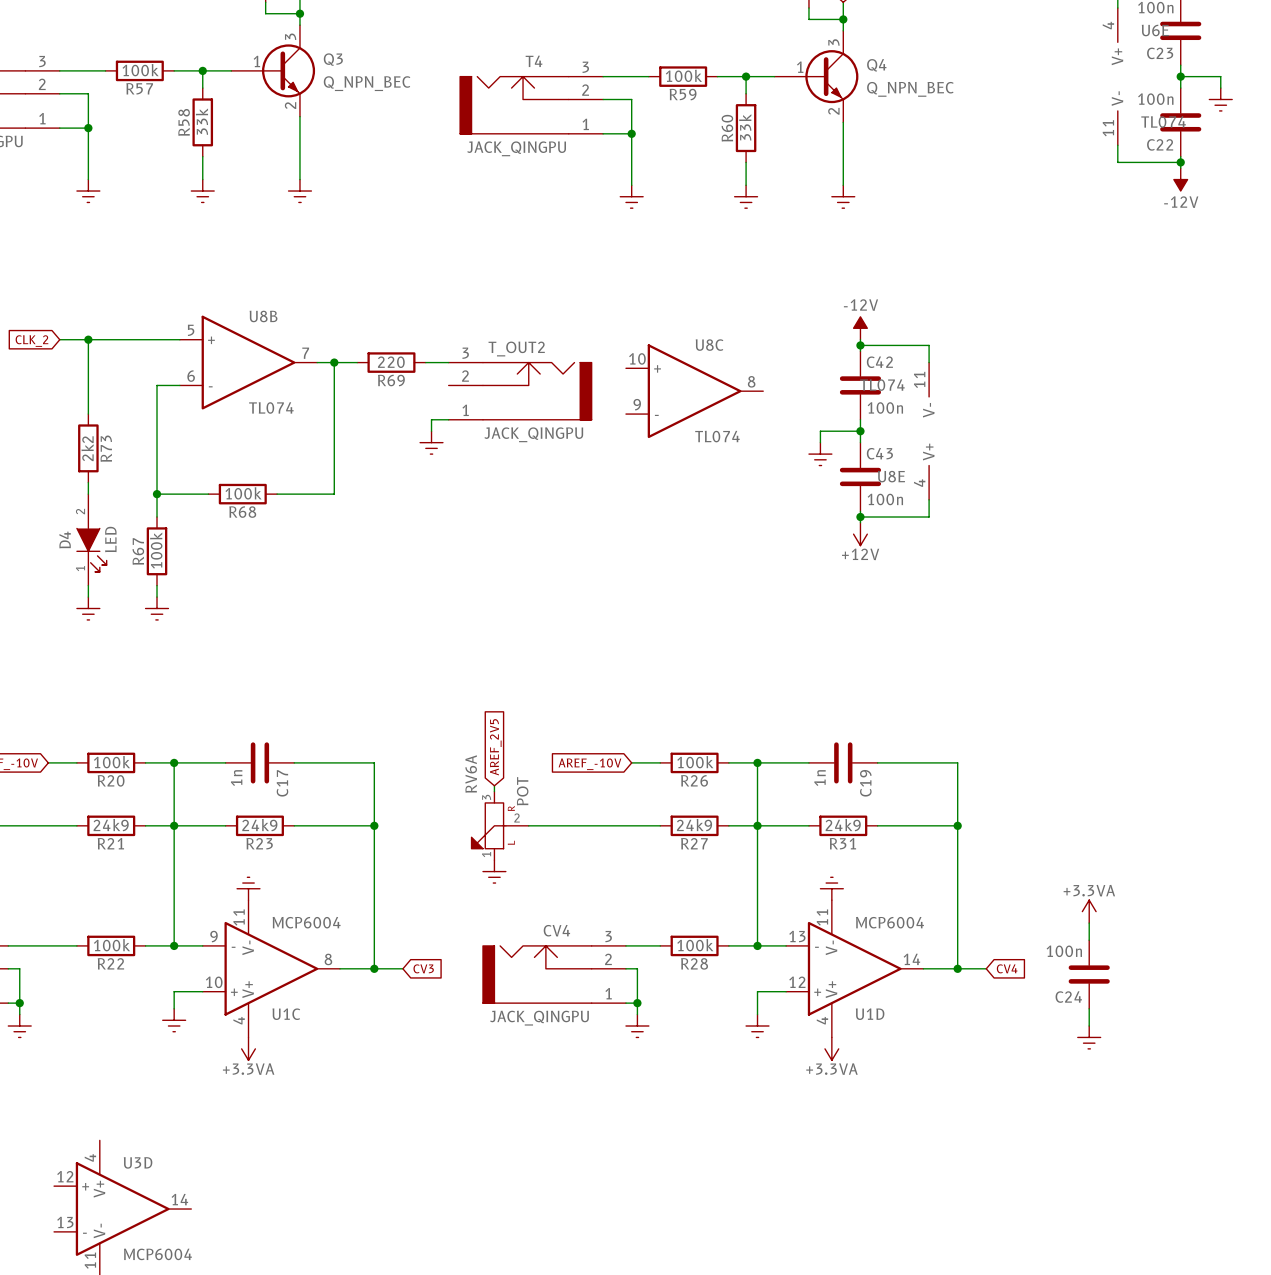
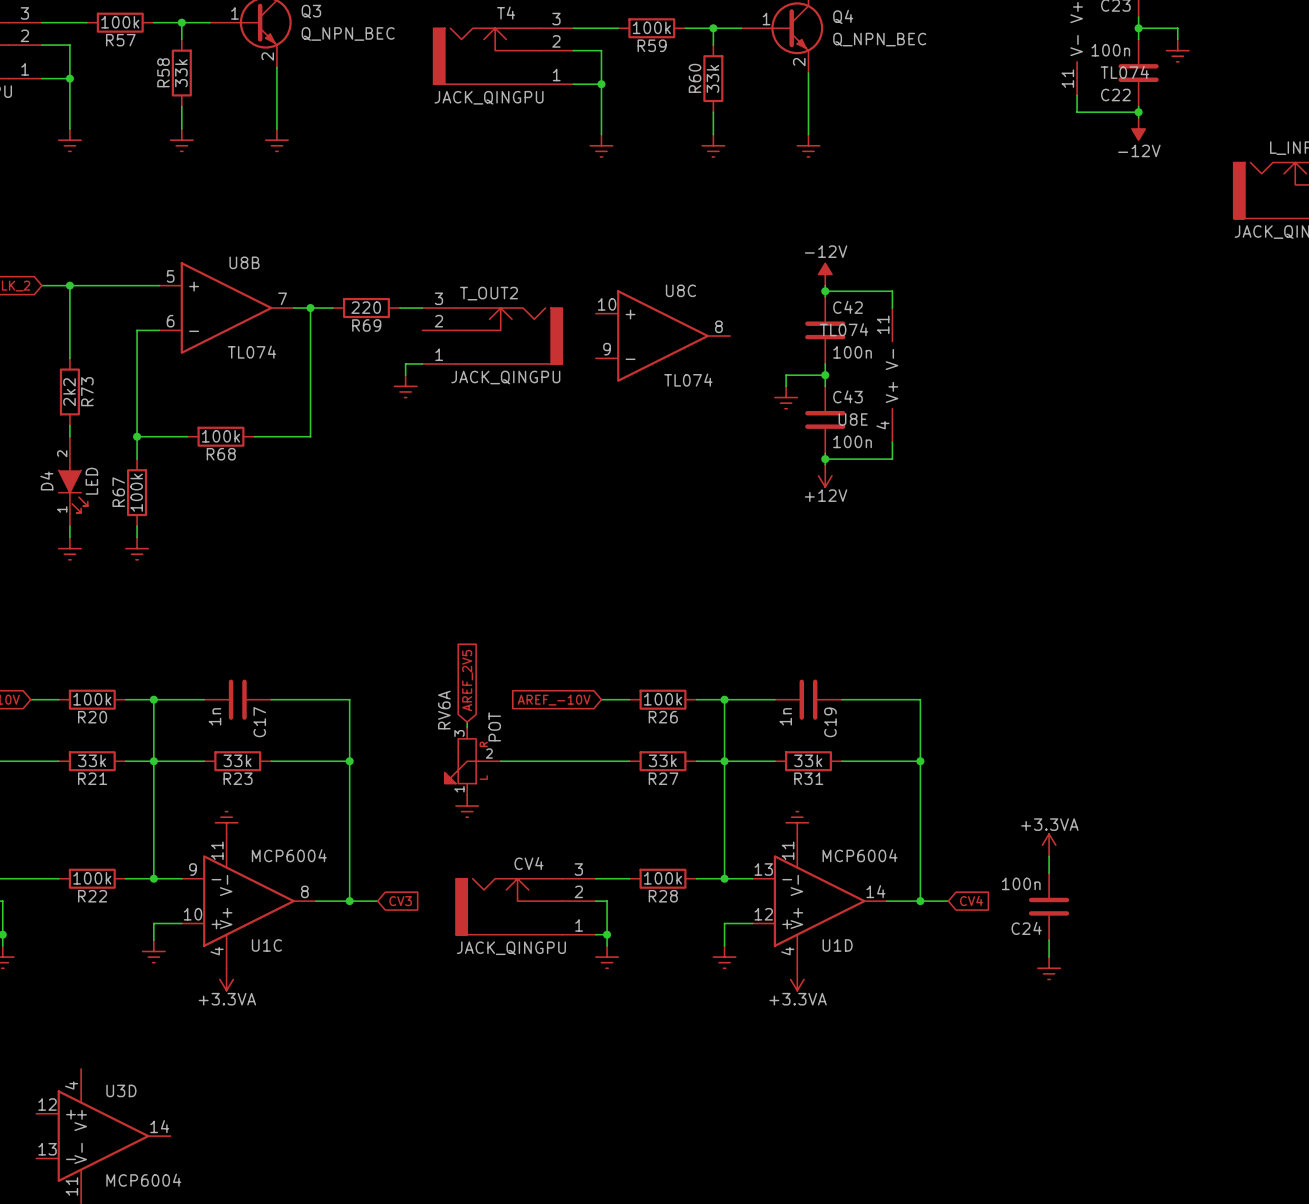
R21 value: 24k9 (111, 825) -> 33k (92, 760)
R23 value: 24k9 (259, 825) -> 33k (237, 760)
R27 value: 24k9 (694, 825) -> 33k (662, 760)
R31 value: 24k9 (843, 825) -> 33k (808, 760)

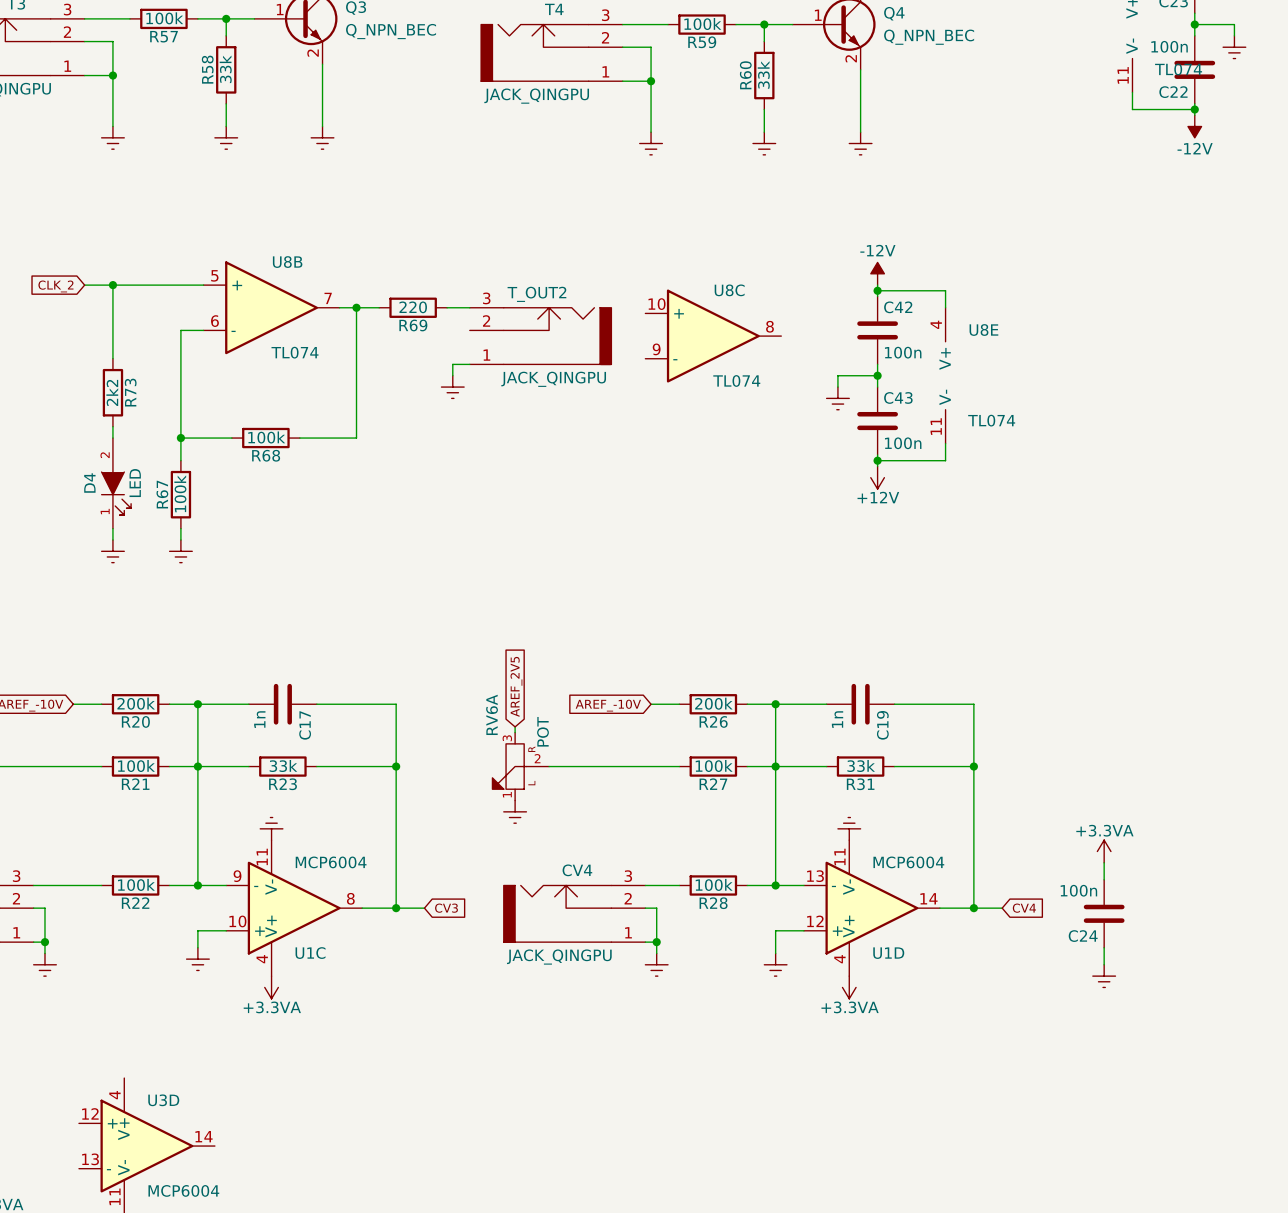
U8E rotation: 0° (892, 375) -> 180° (945, 375)
R20 value: 100k (92, 699) -> 200k (136, 703)
R26 value: 100k (663, 699) -> 200k (713, 703)
R21 value: 33k (92, 760) -> 100k (136, 765)
R27 value: 33k (662, 760) -> 100k (714, 765)

